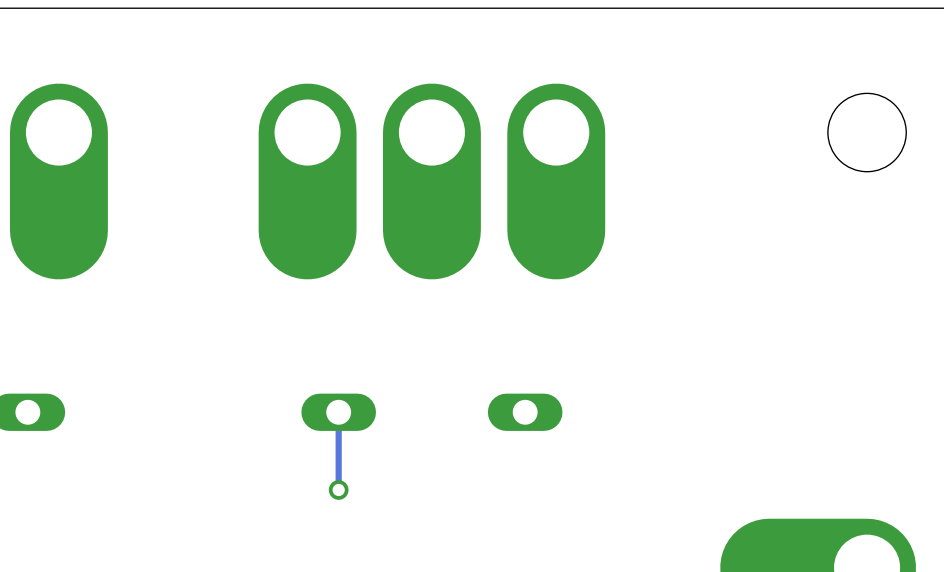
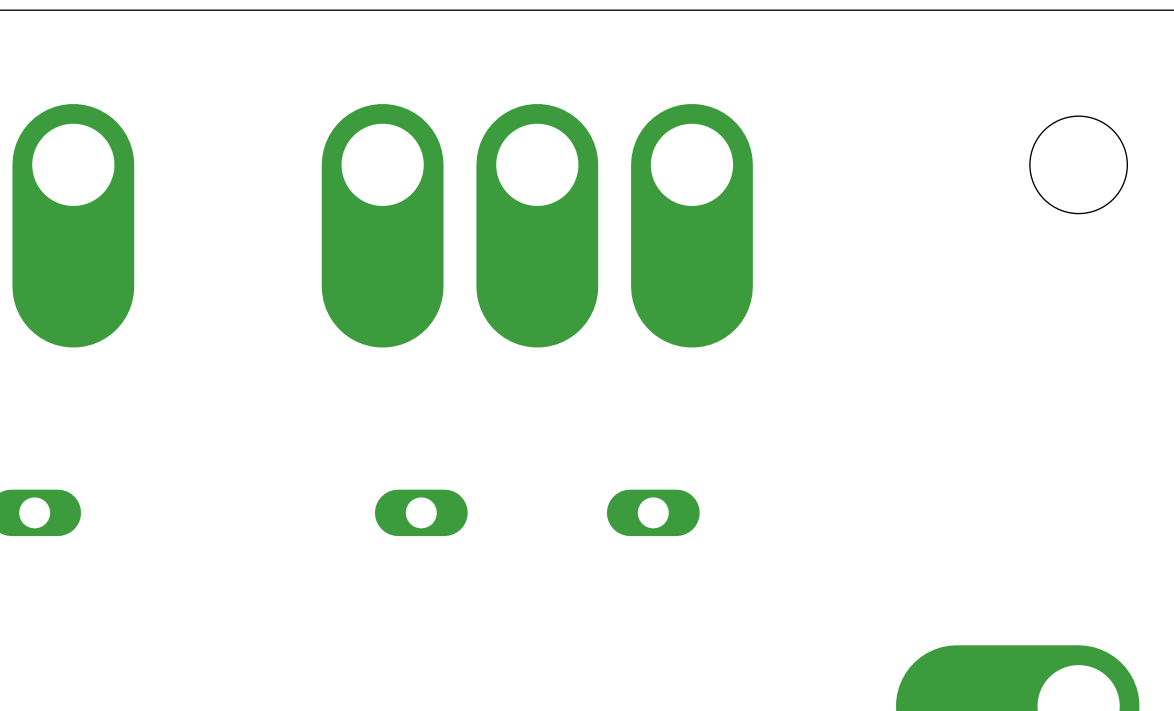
track: (338, 412) (338, 489) -> none
via: (338, 489) -> none

